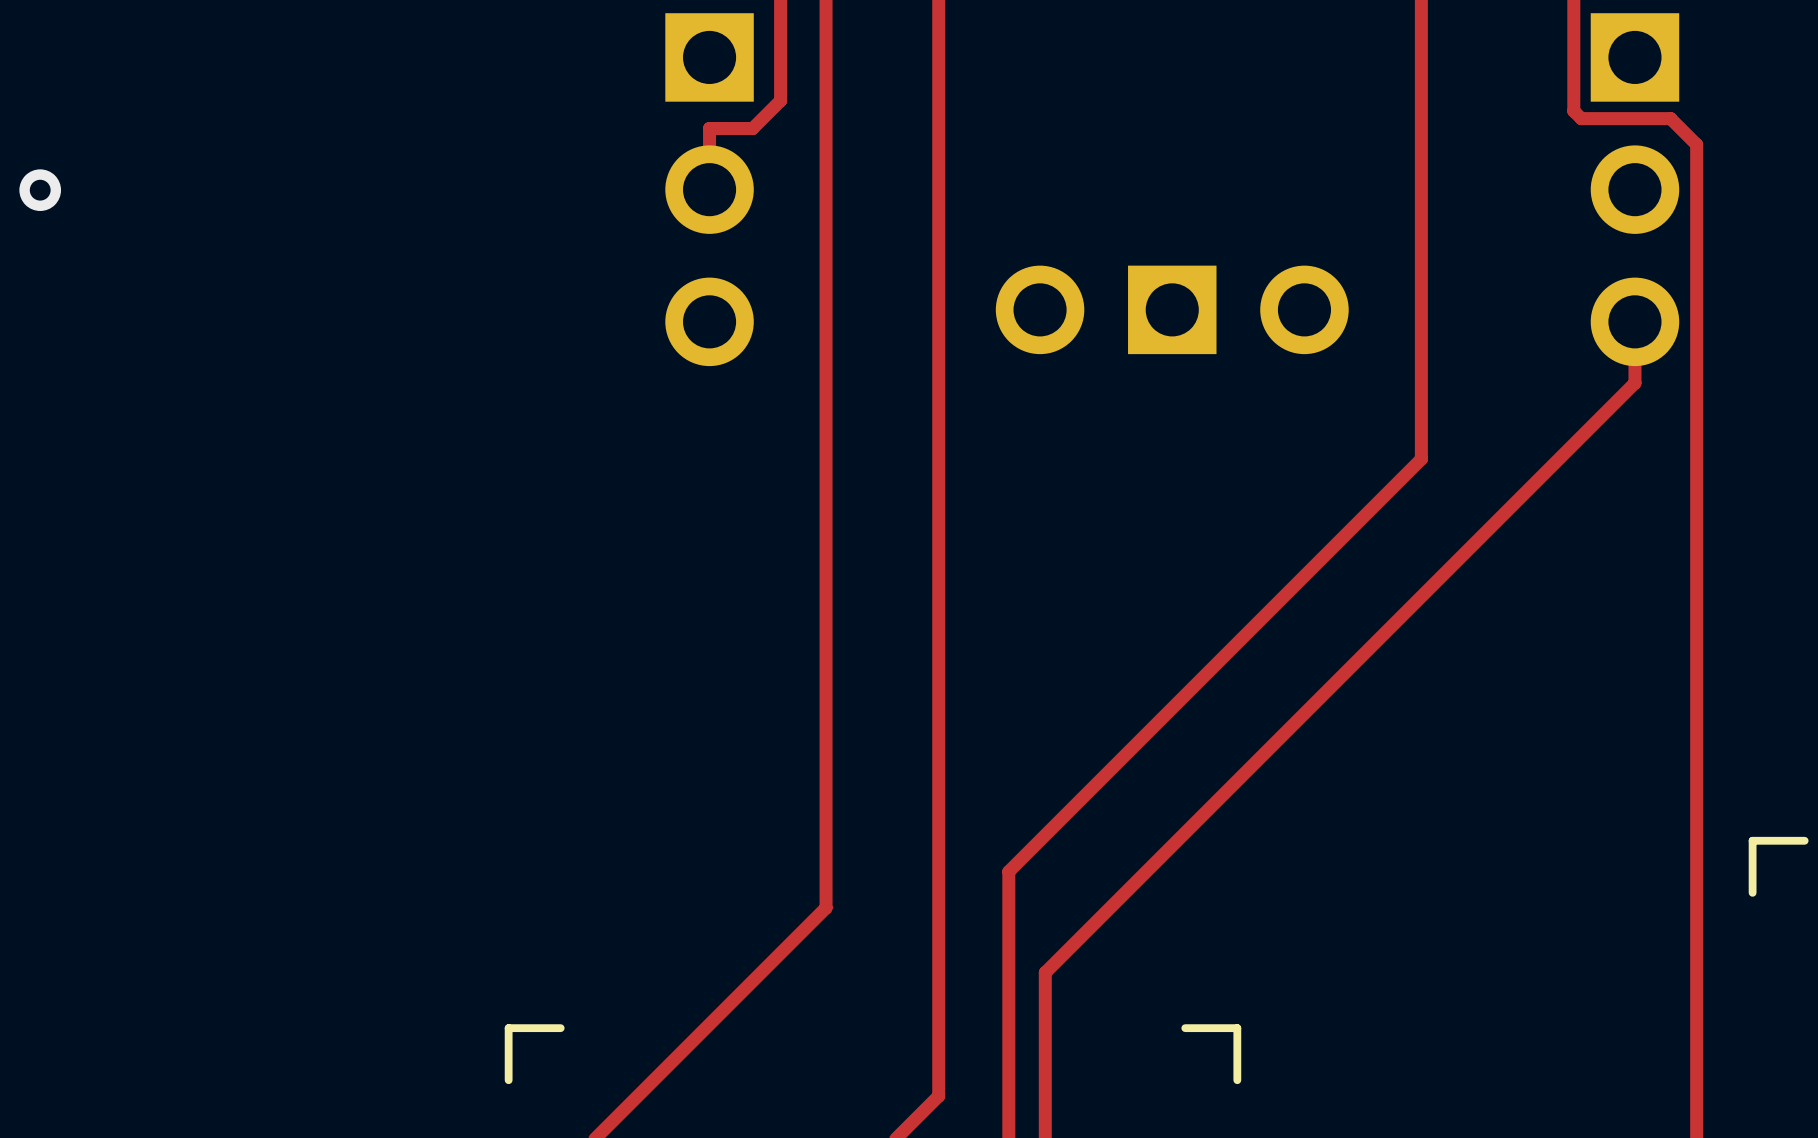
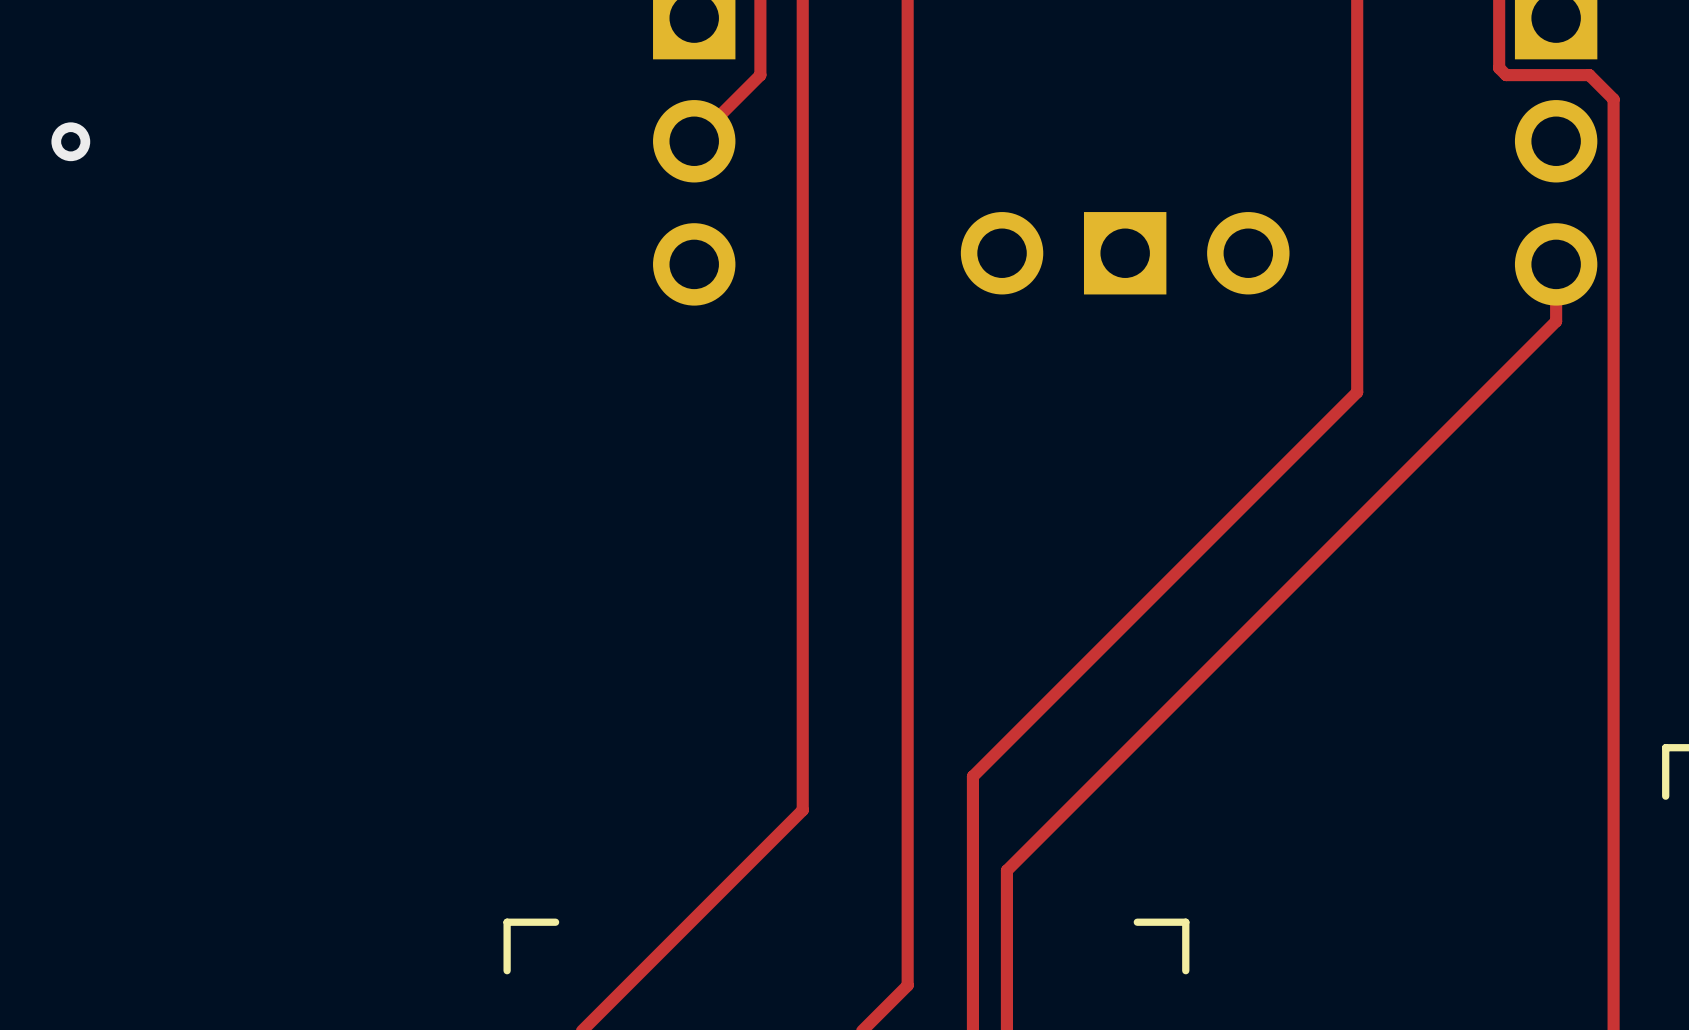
track: (780, 100) (752, 128) (709, 128) (709, 189) -> (760, 58) (760, 75) (694, 141)

